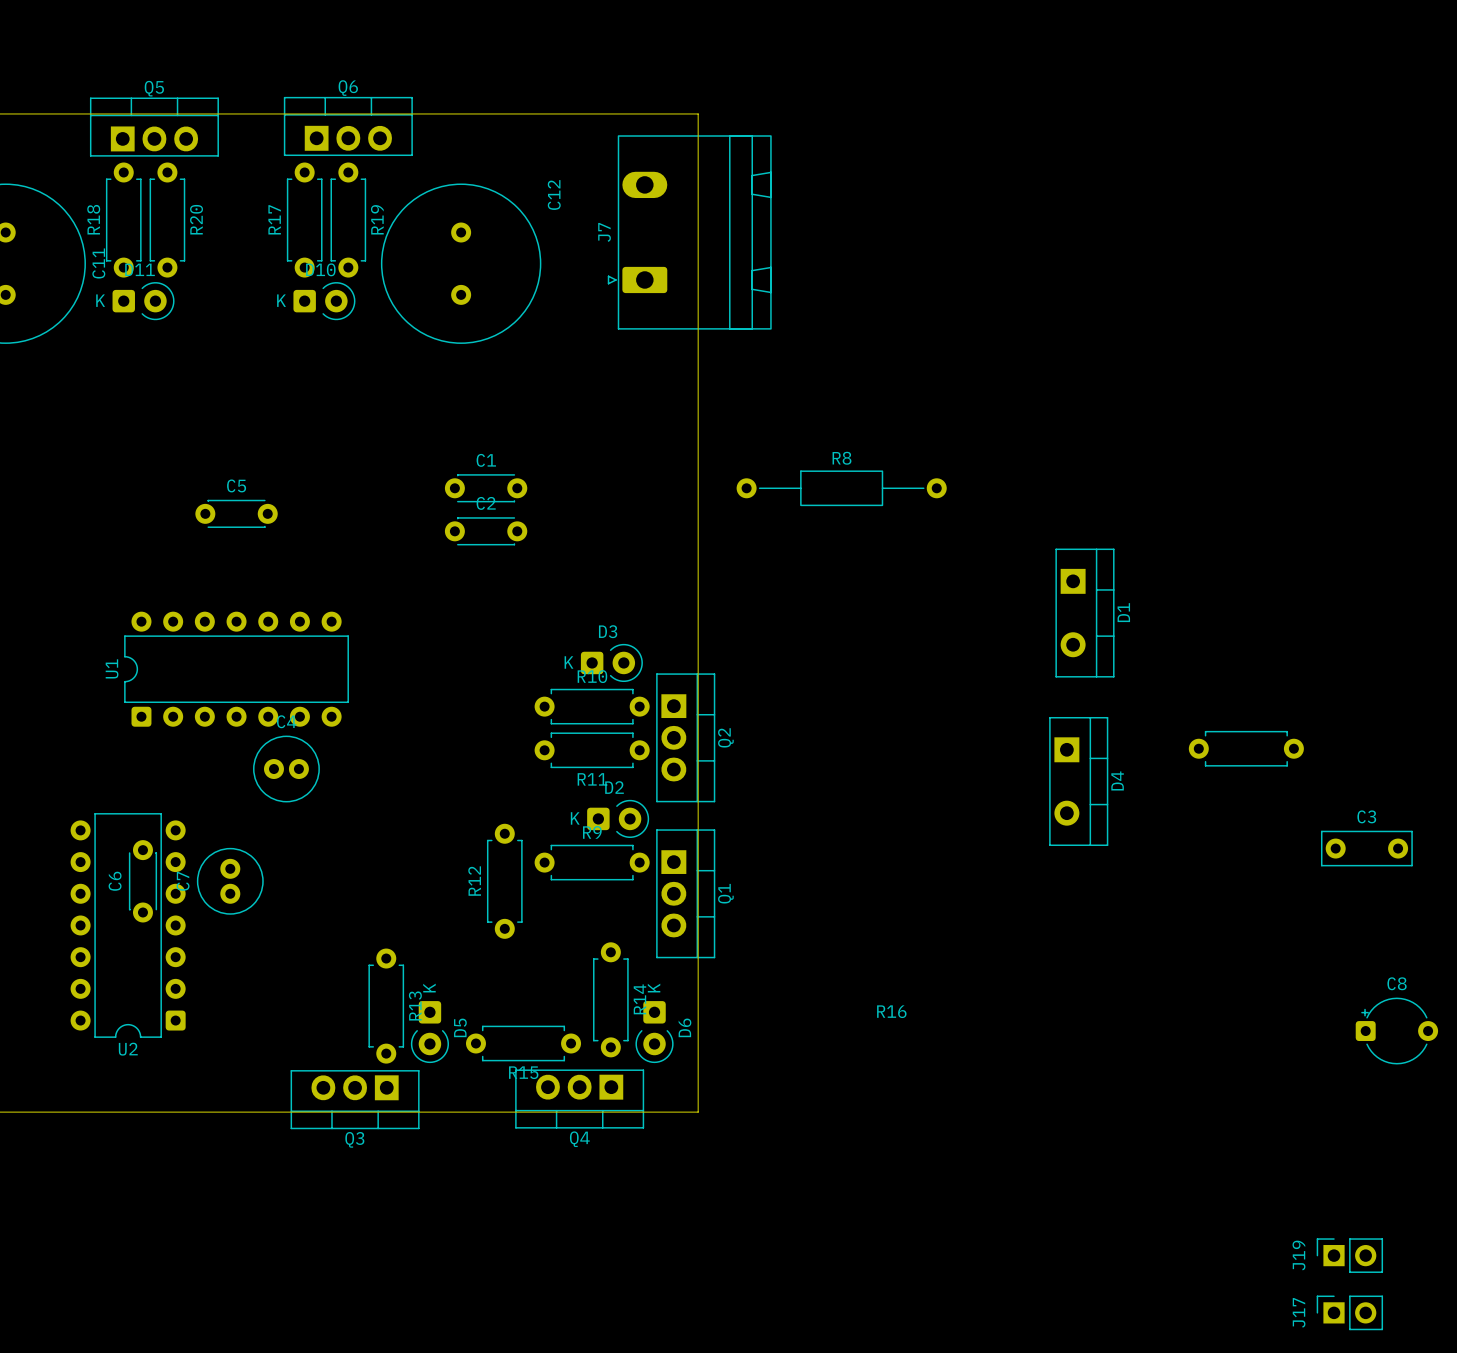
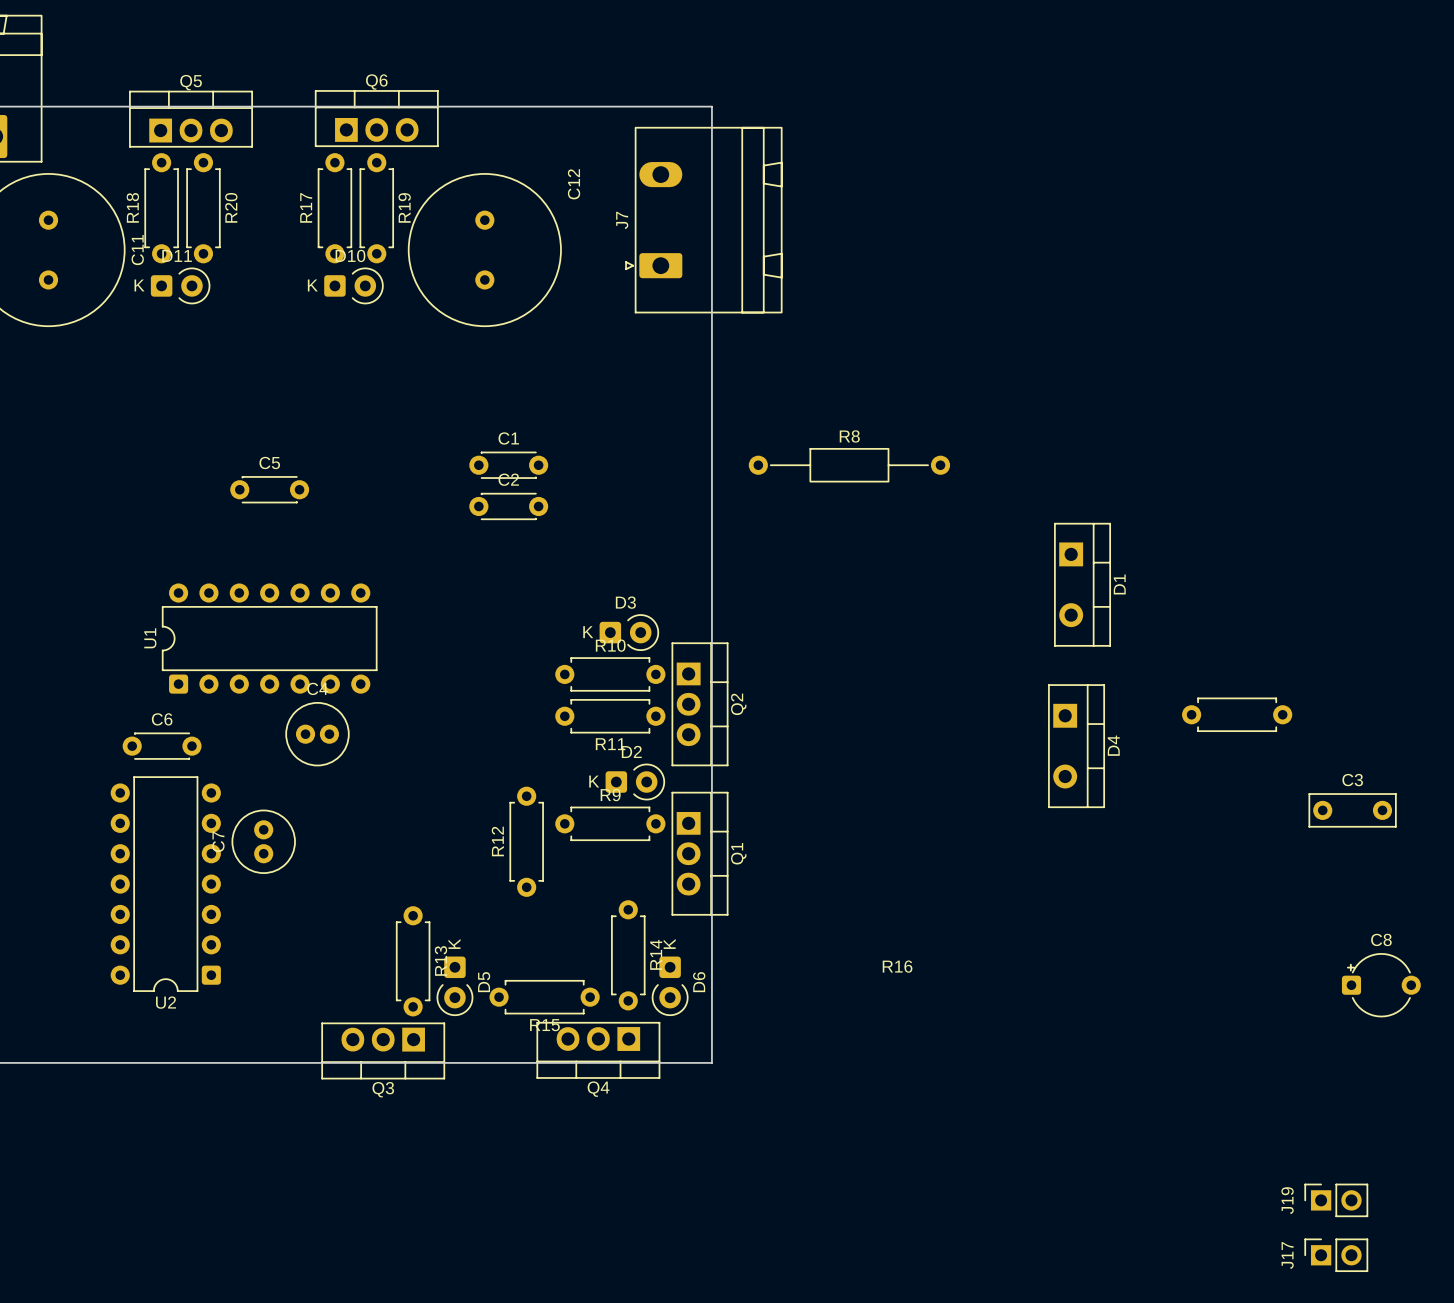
C6 rotation: 0° (142, 881) -> 90° clockwise (162, 746)
C6 position: (142, 881) -> (162, 746)

